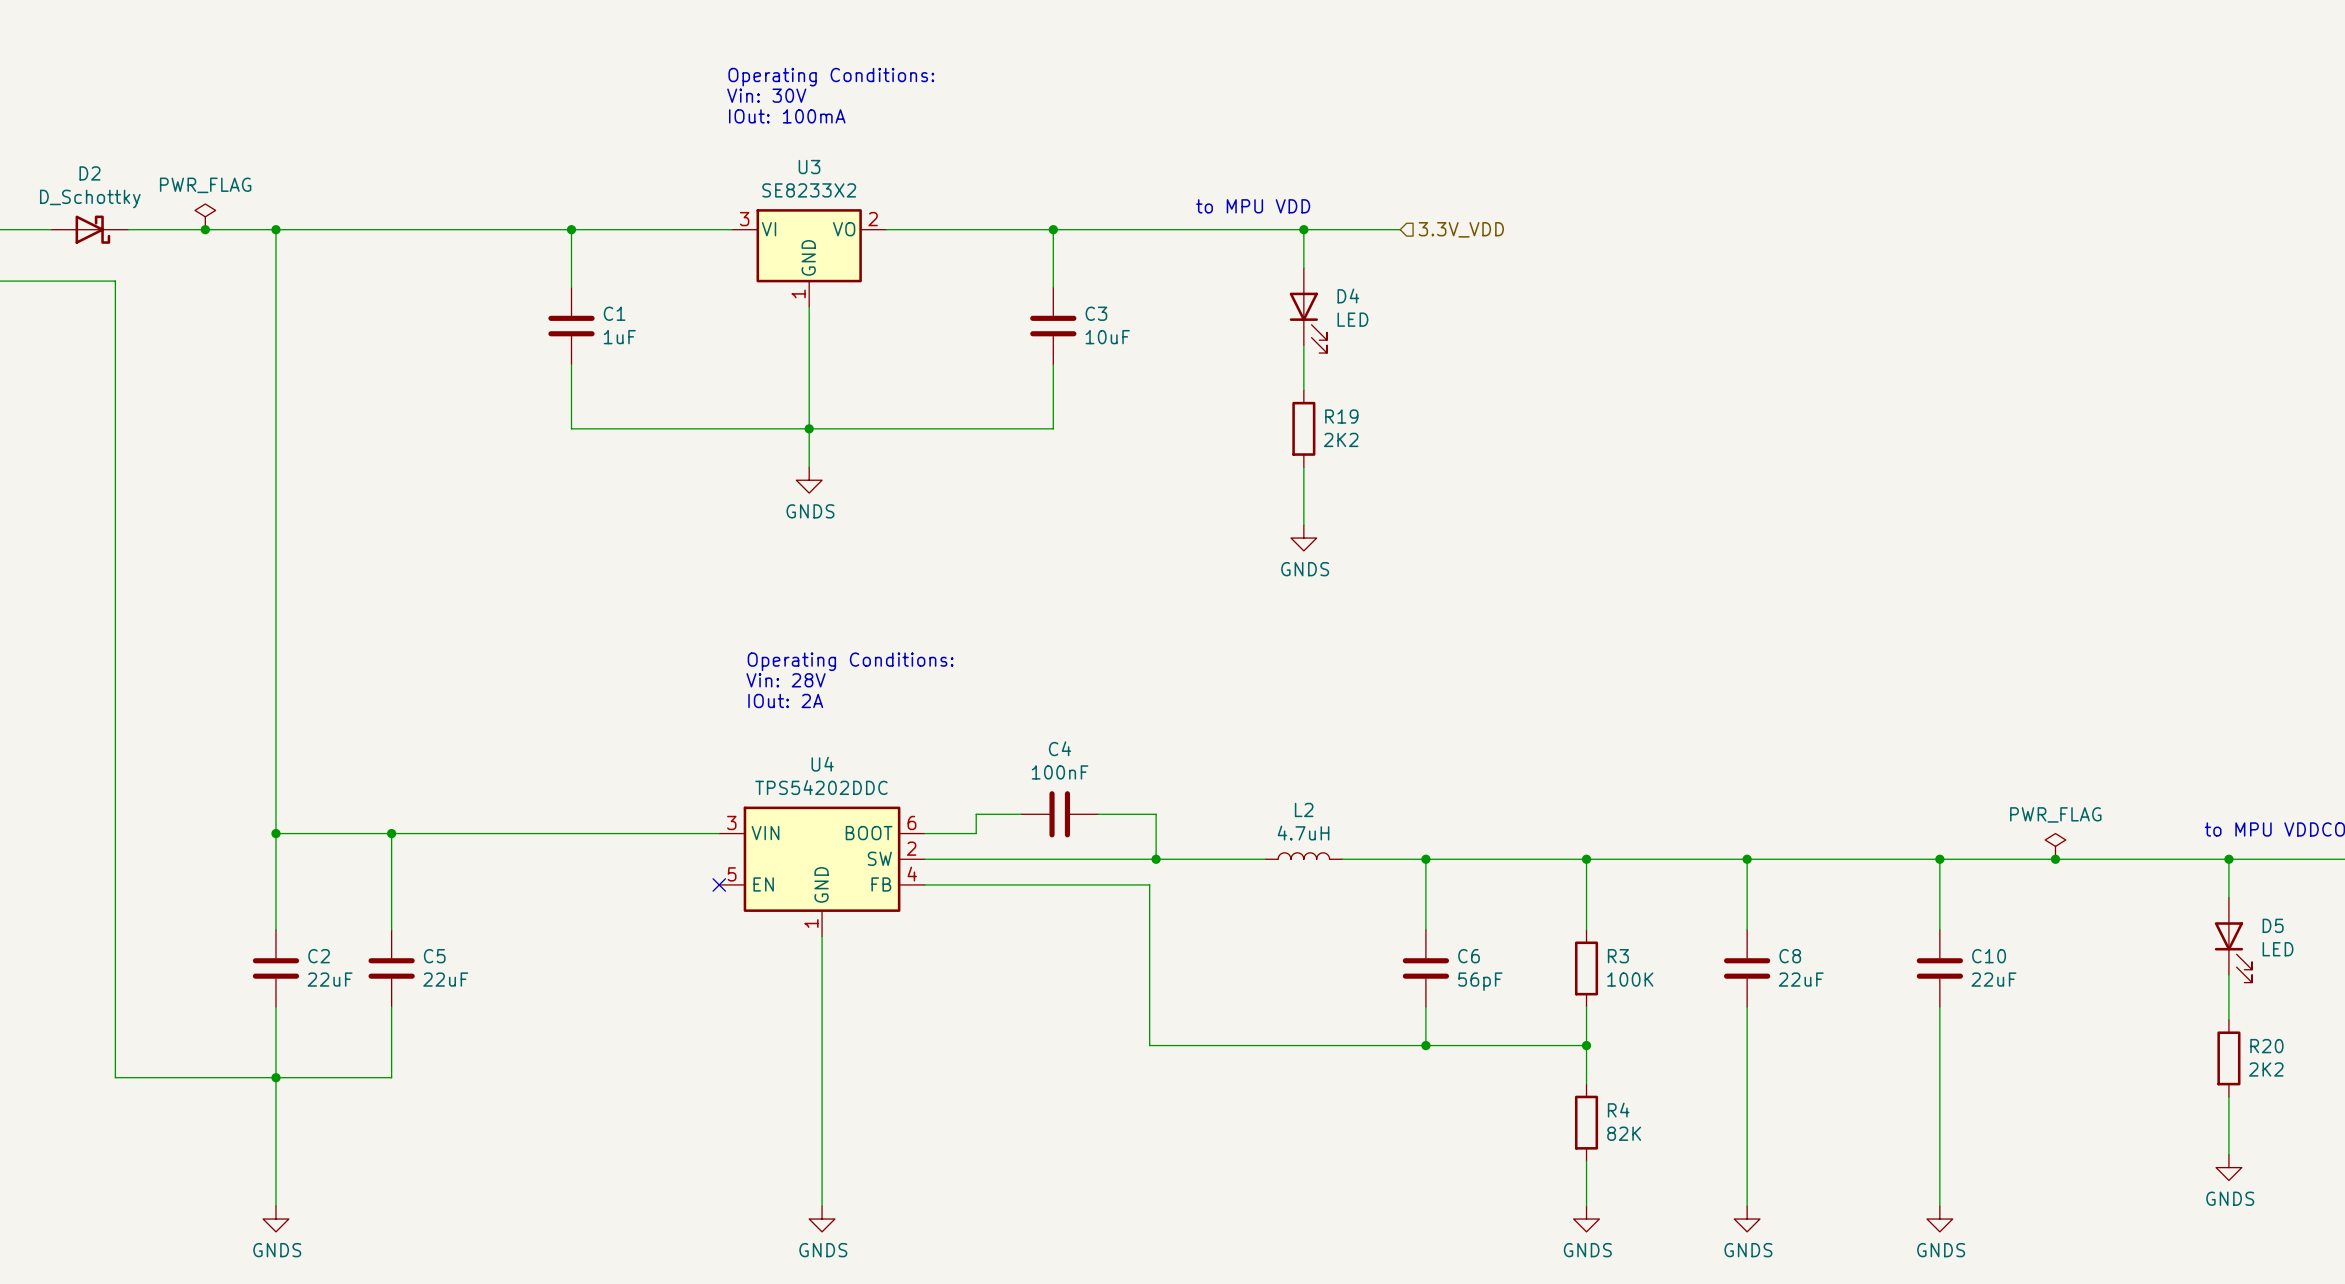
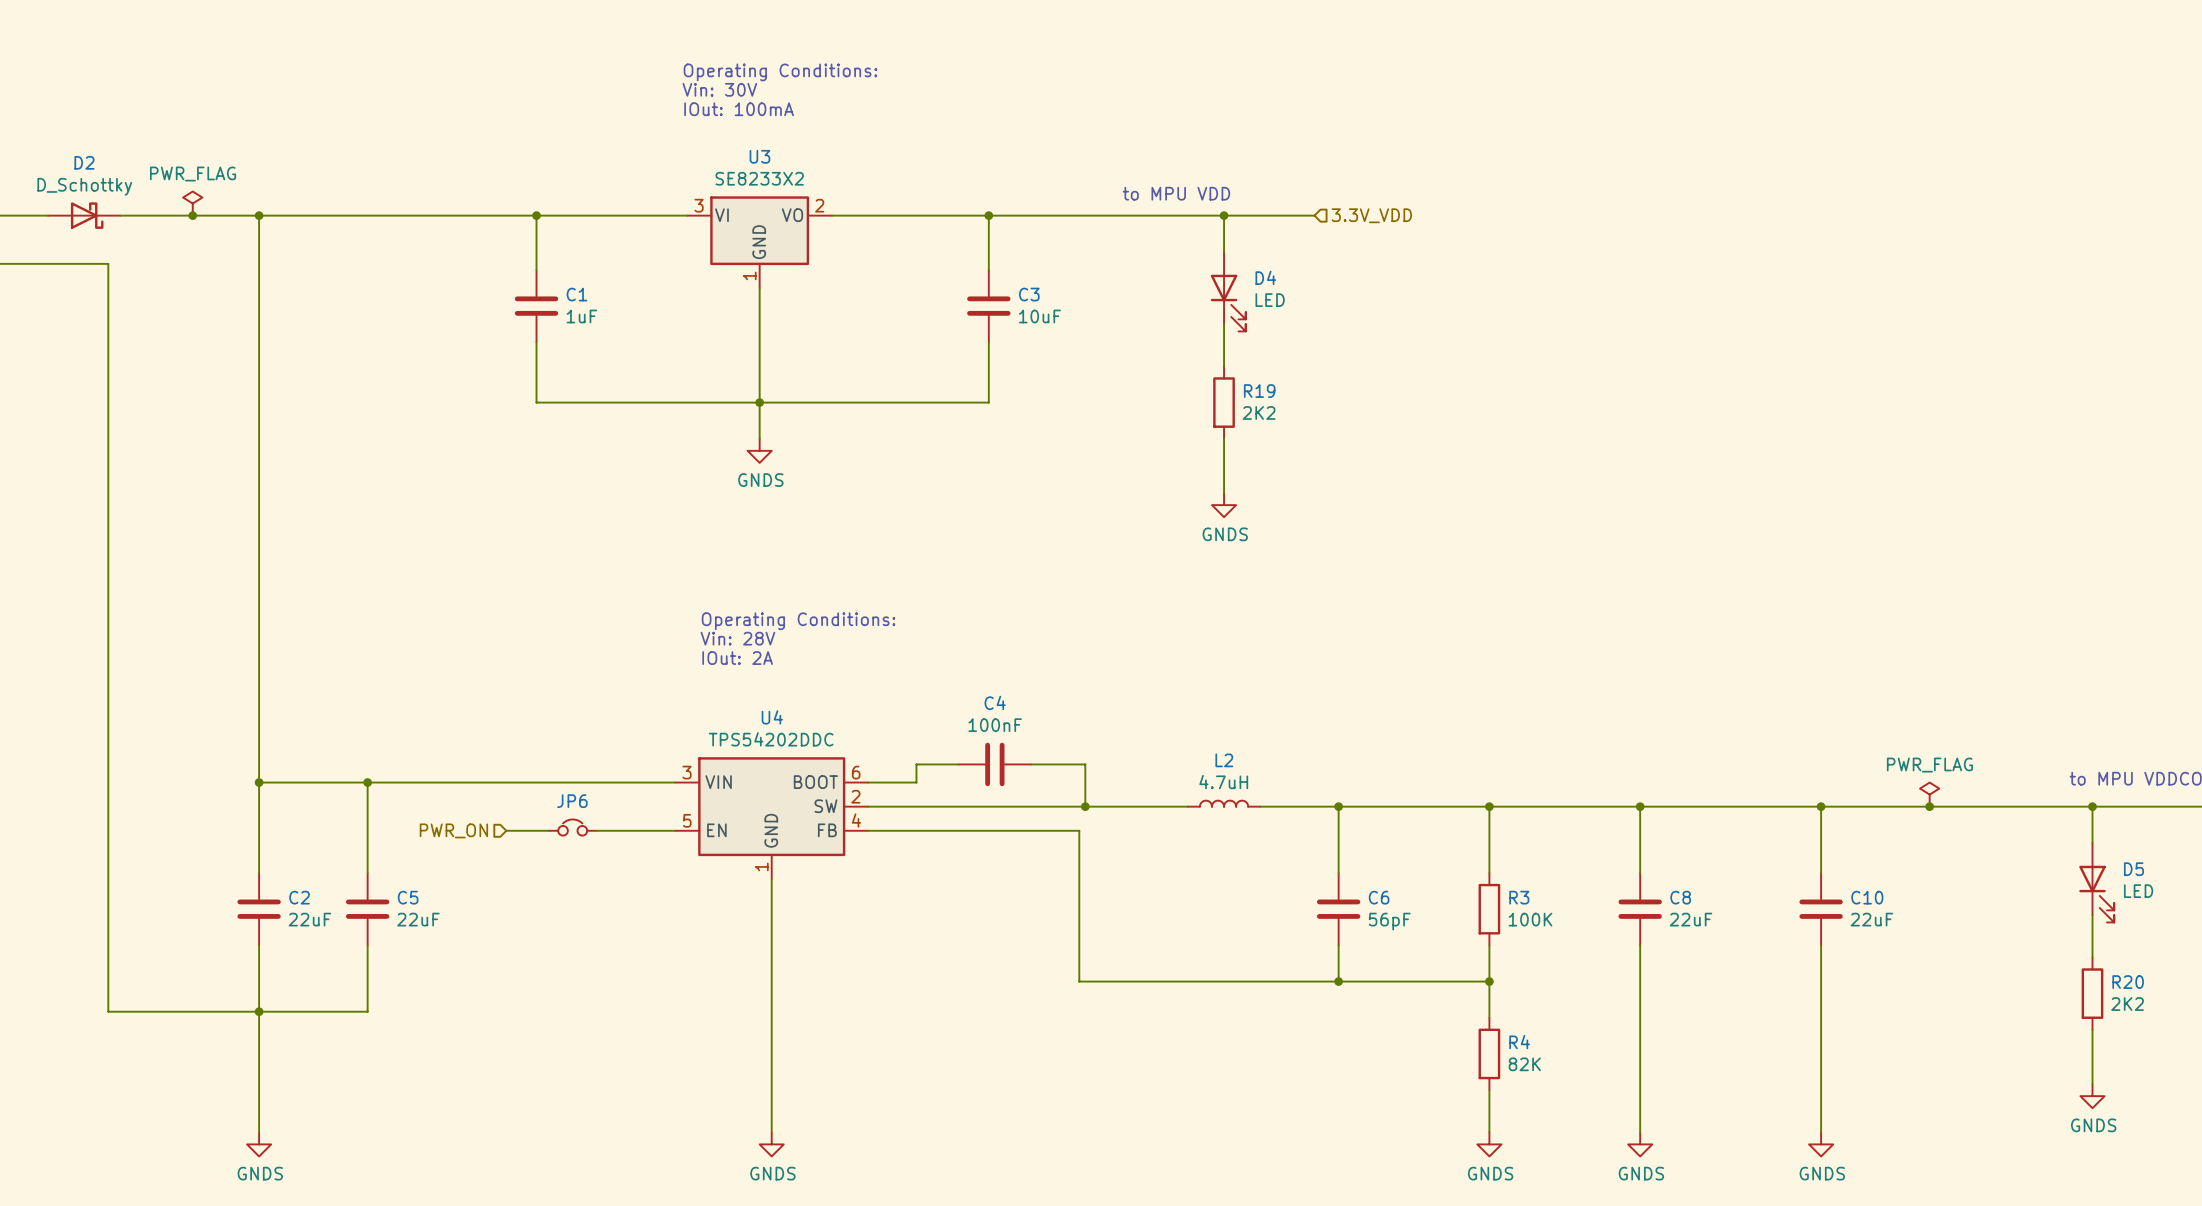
JP6: none -> (572, 827)
wire: none -> (506, 830) (548, 830)
wire: none -> (596, 830) (675, 830)
no-connect mark: (719, 884) -> none
hierarchical label: none -> PWR_ON (453, 830)

